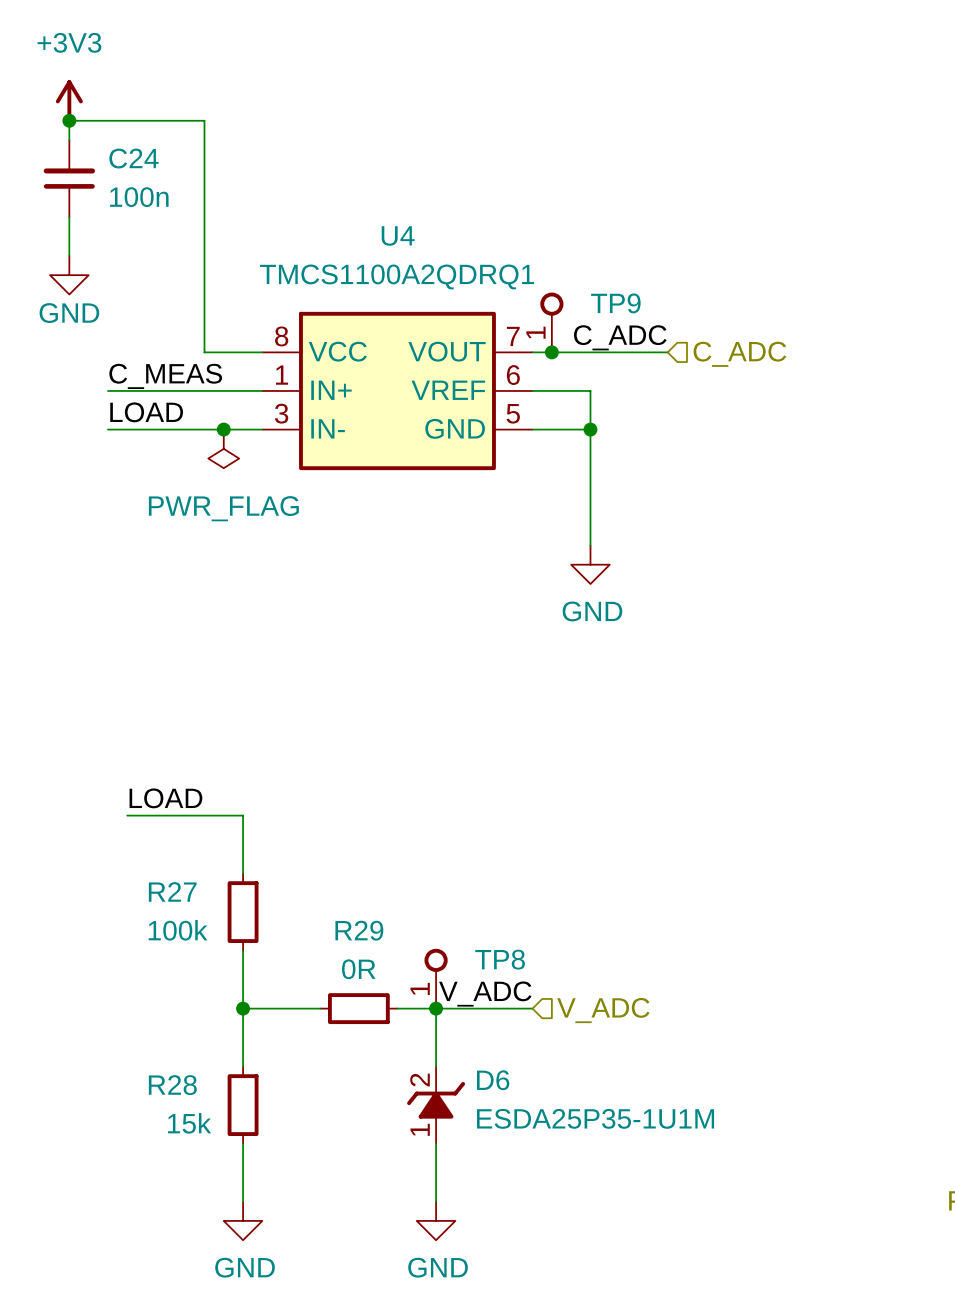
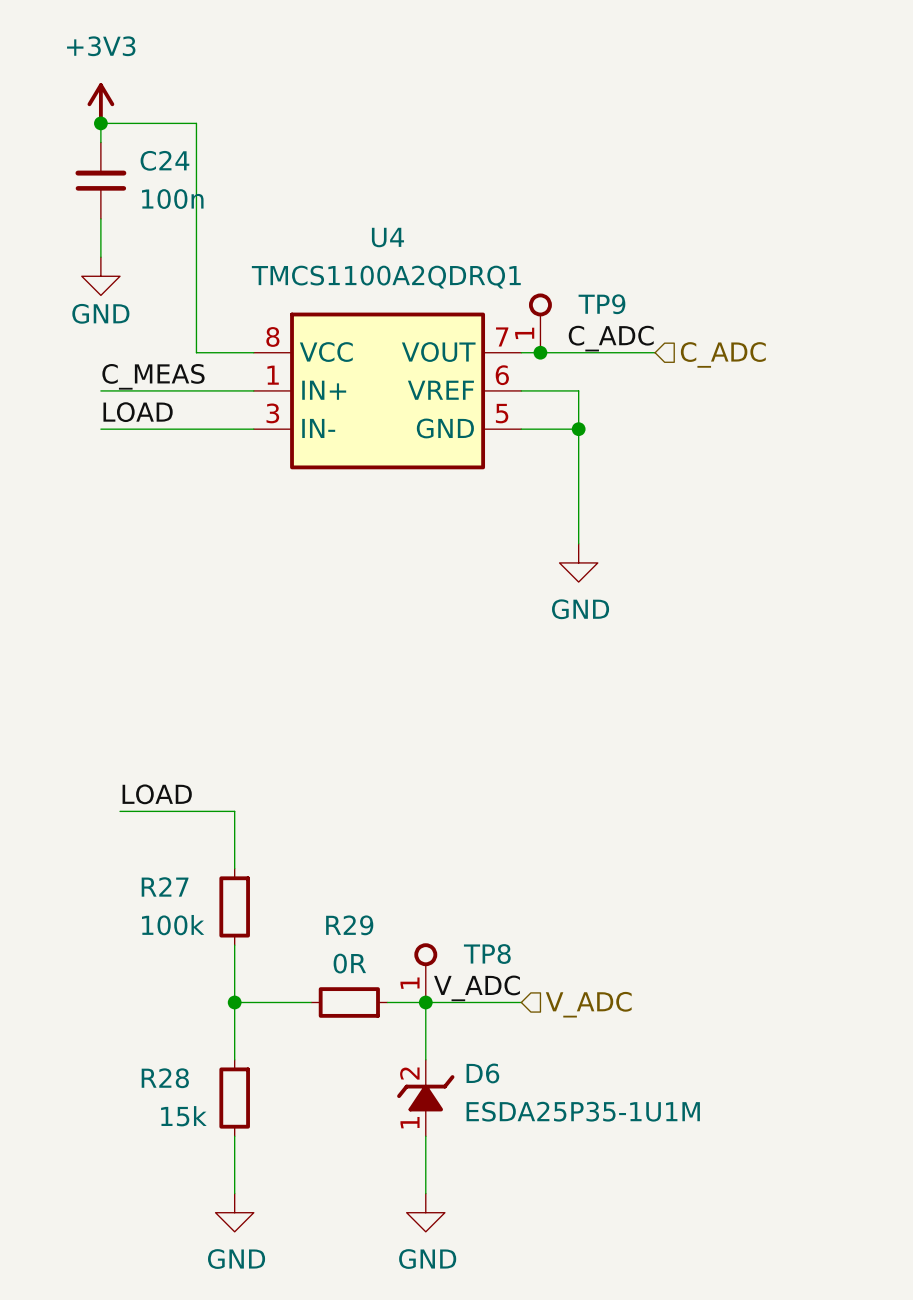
power symbol position: +3V3 (69, 101) -> +3V3 (100, 104)
junction position: (69, 120) -> (100, 123)
wire: (107, 120) (69, 120) (69, 140) -> (100, 123) (100, 142)
C24 position: (69, 178) -> (100, 180)
wire: (69, 217) (69, 255) -> (100, 218) (100, 257)
power symbol position: GND (69, 275) -> GND (100, 276)
junction: (223, 429) -> none
power symbol: PWR_FLAG (223, 448) -> none

